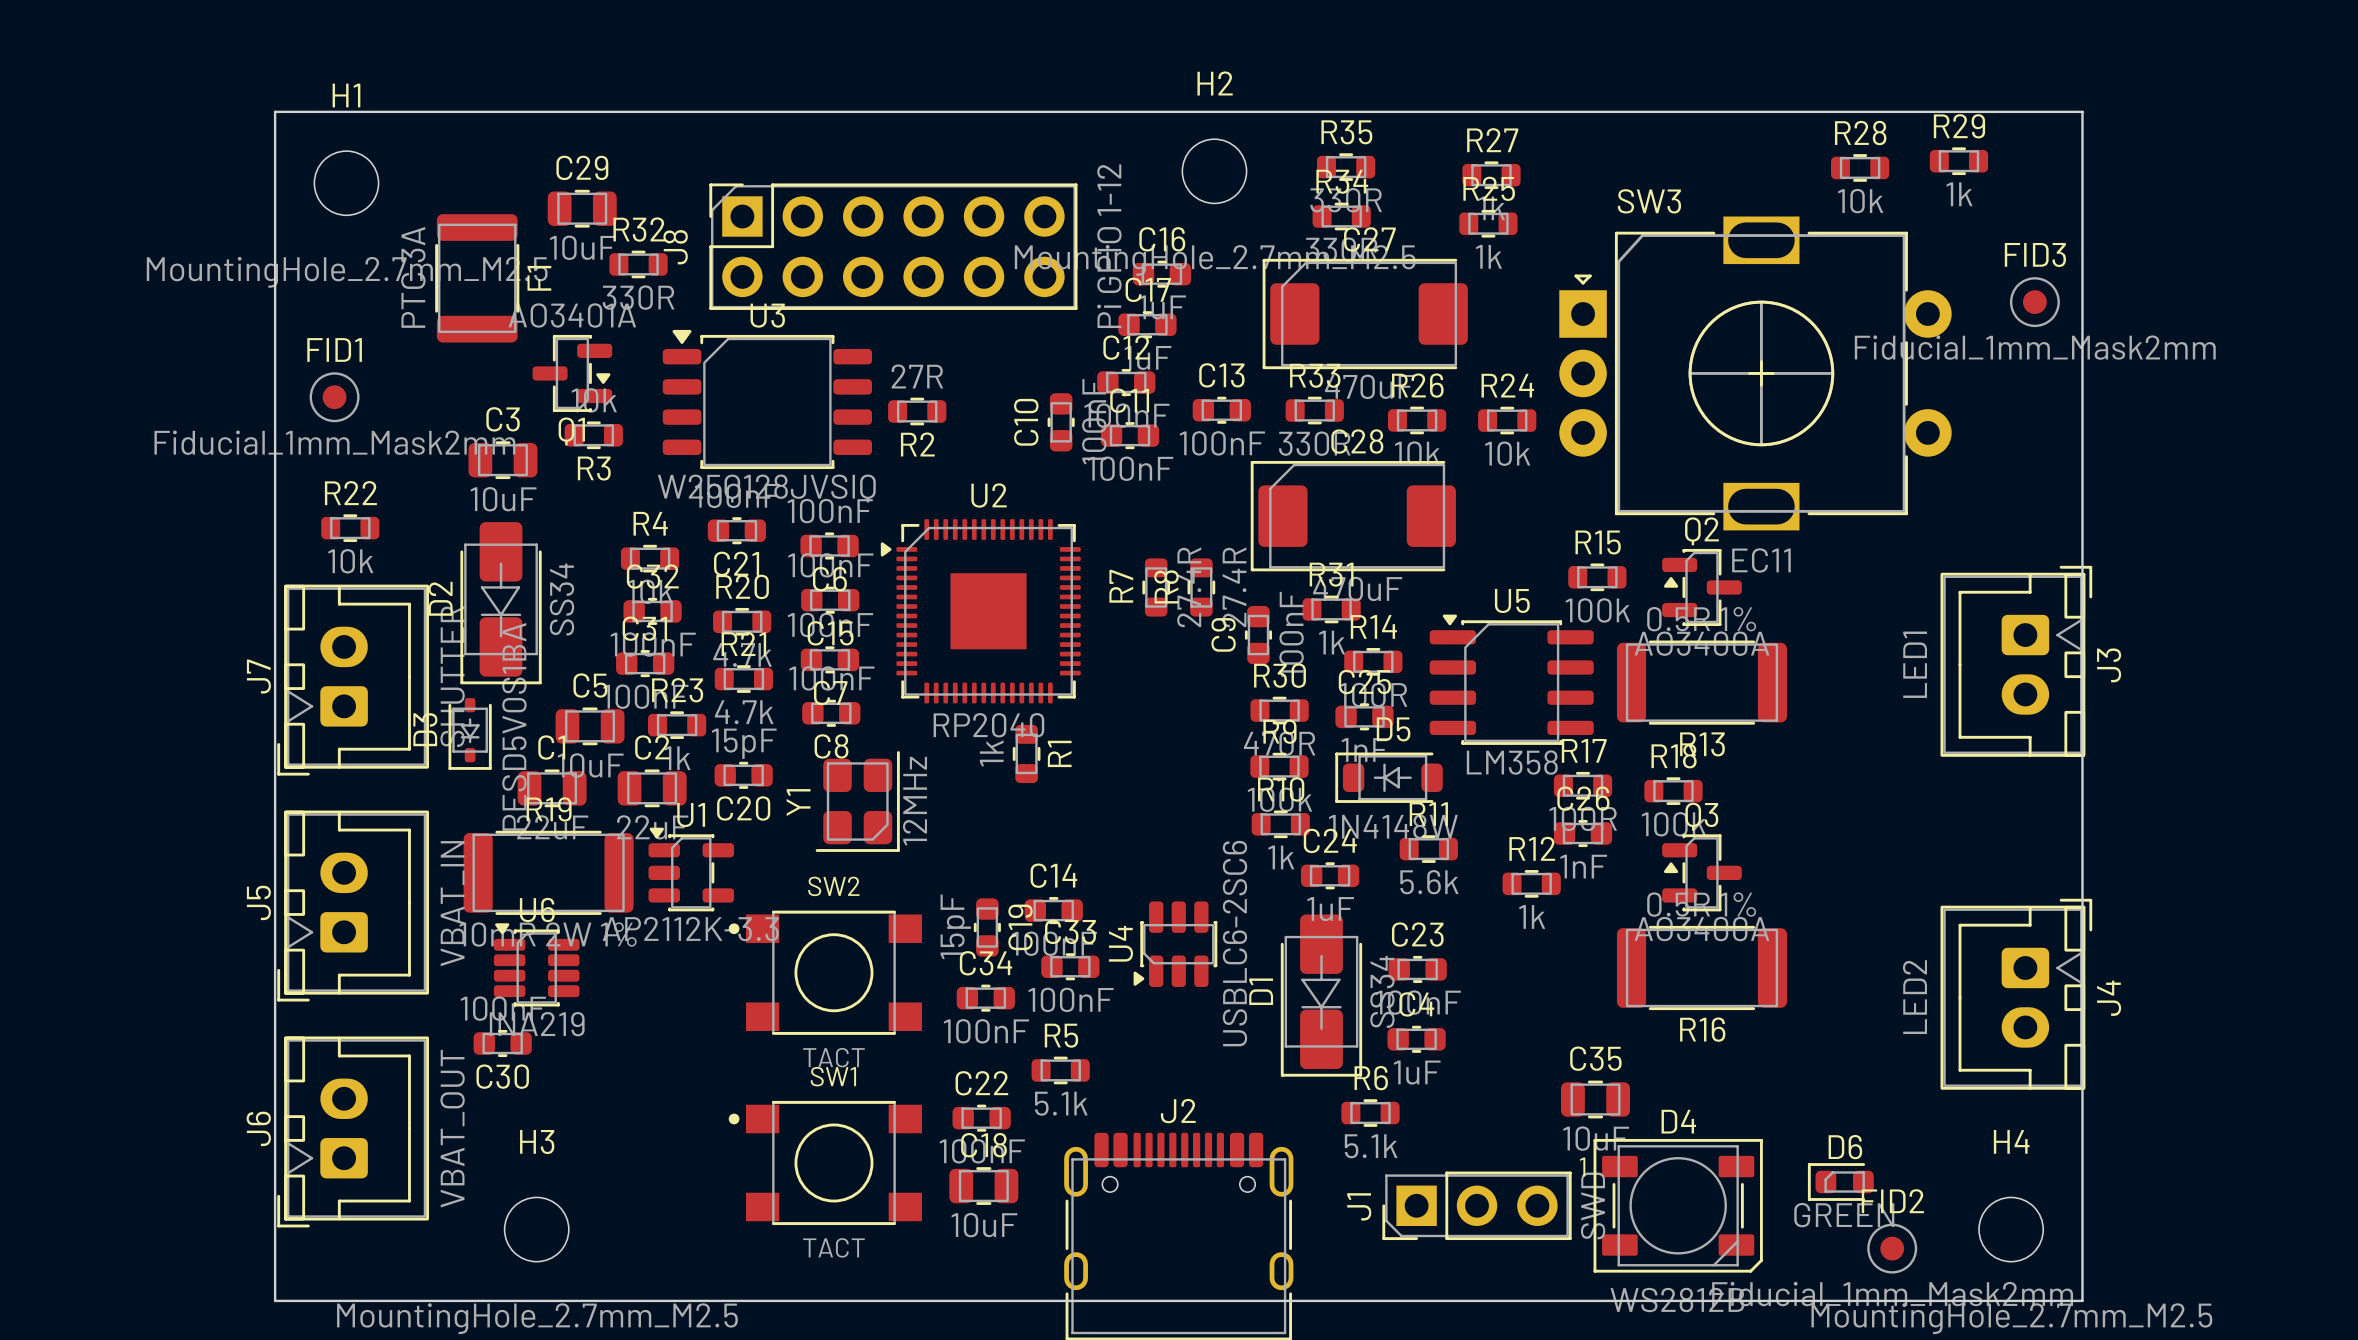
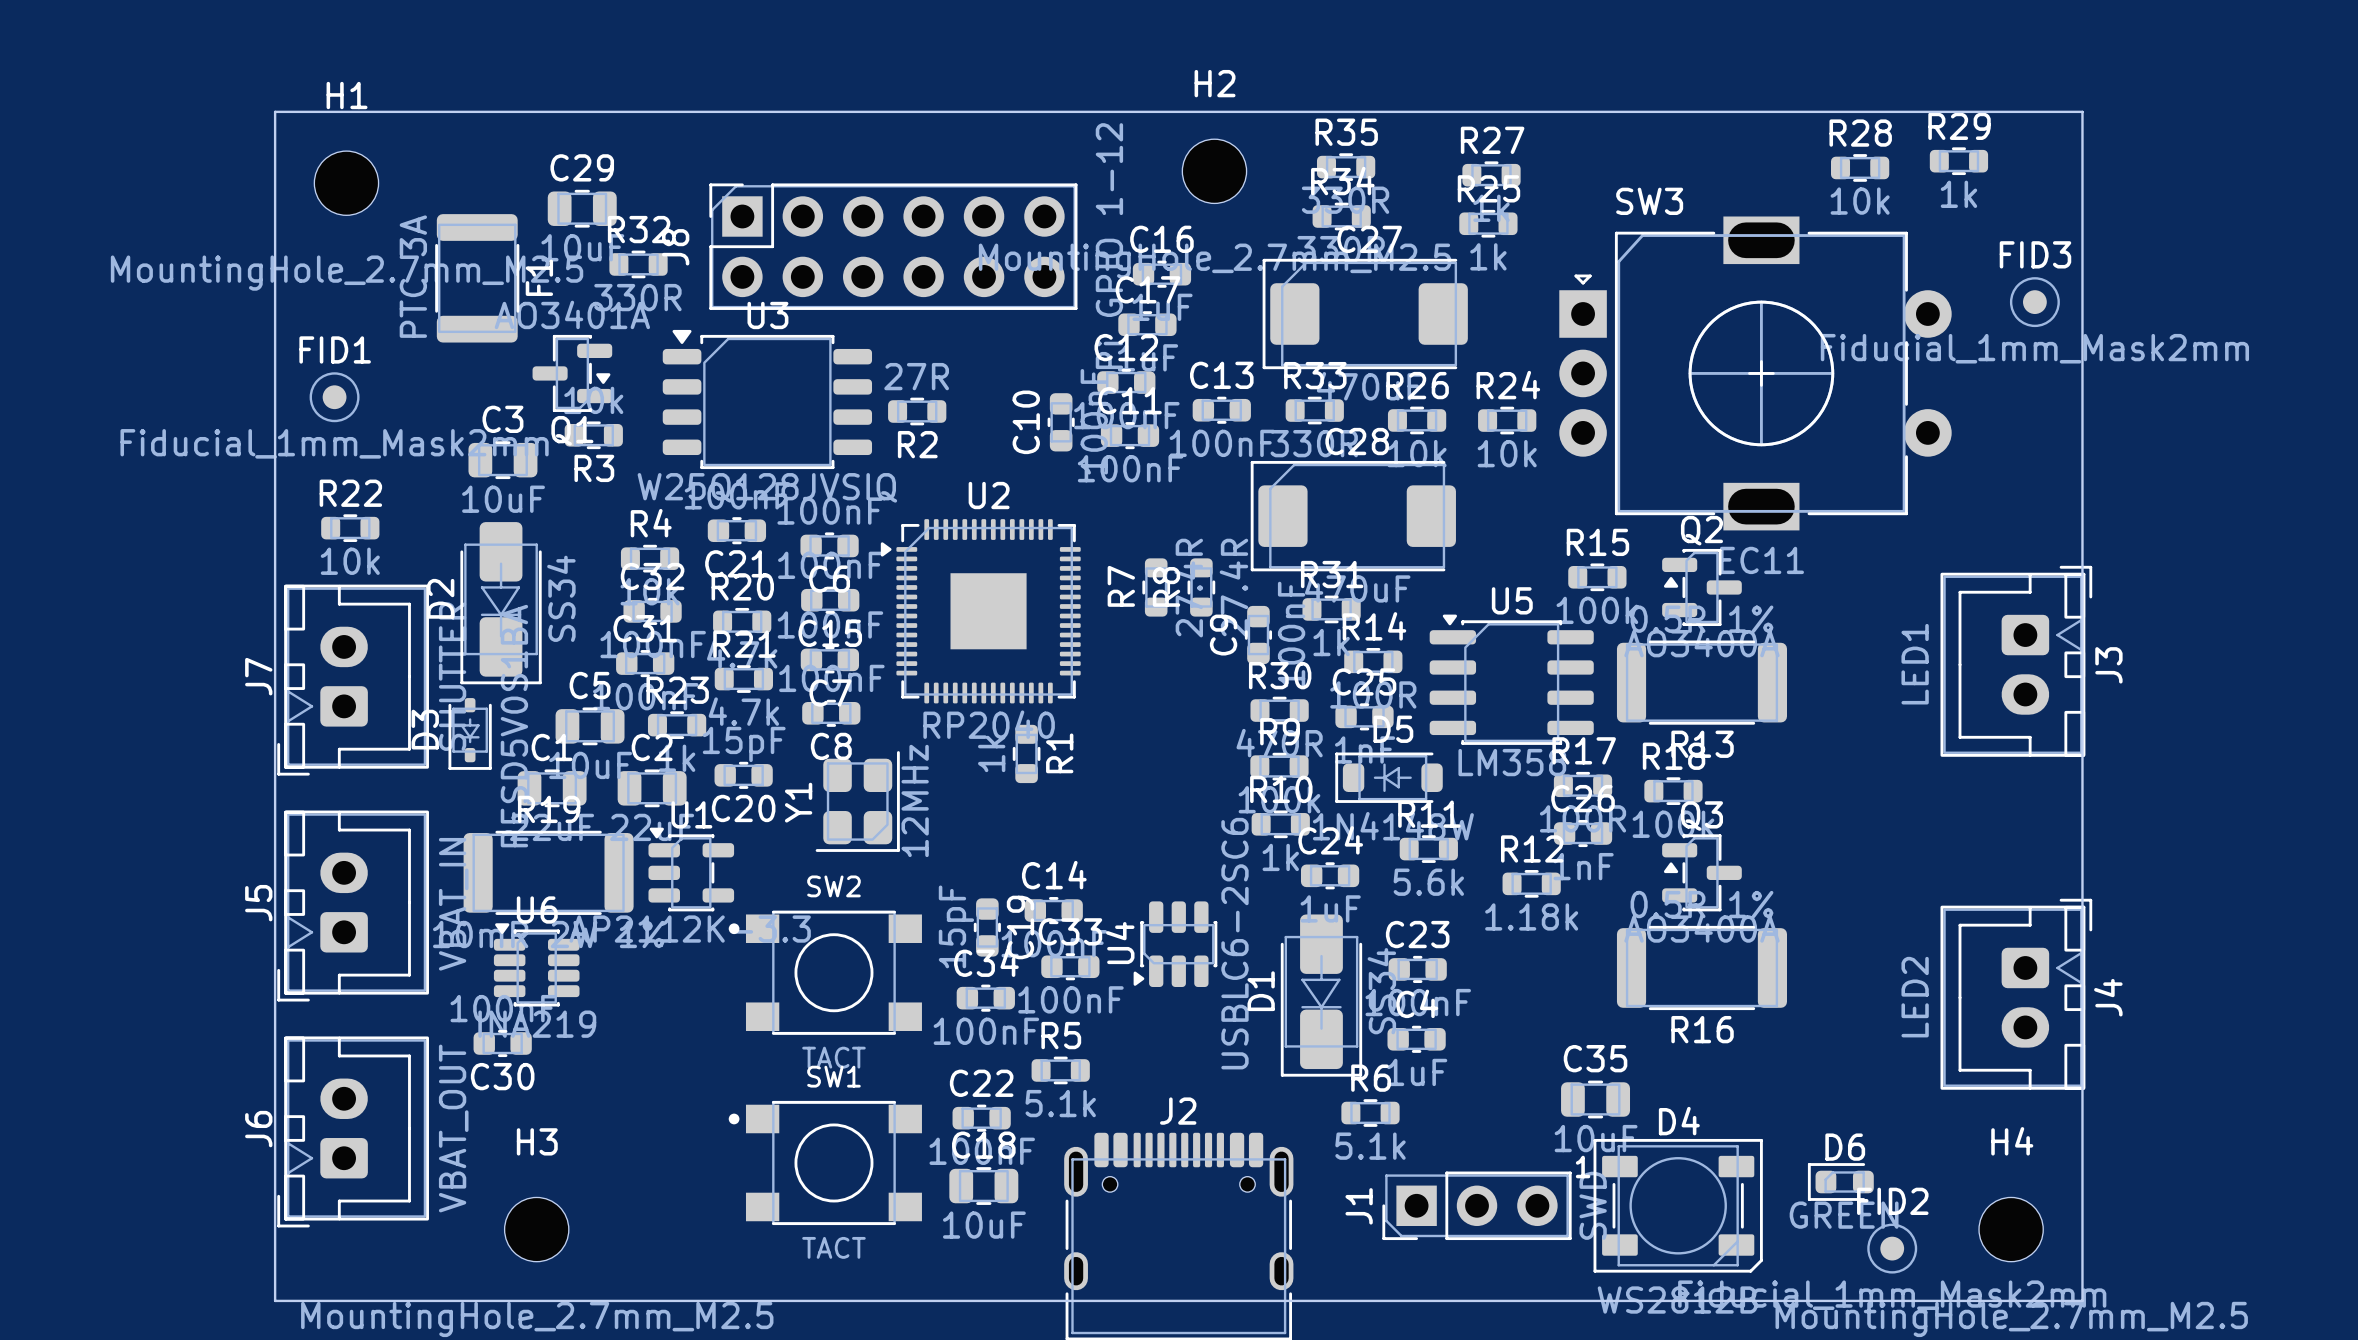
R12 value: 1k (1532, 916) -> 1.18k (1531, 916)

